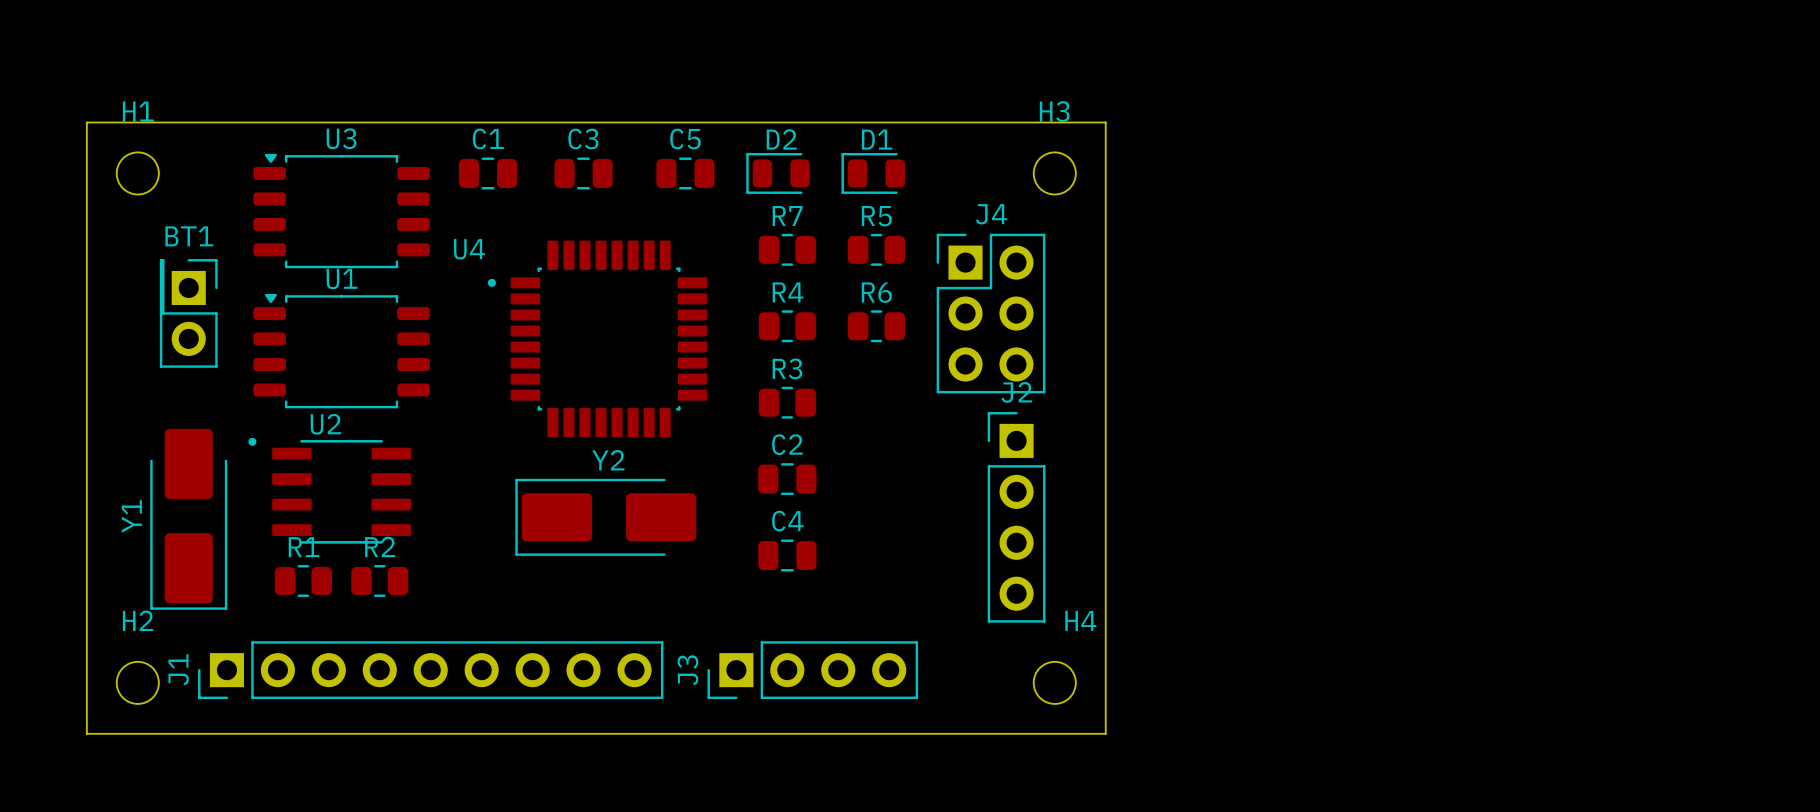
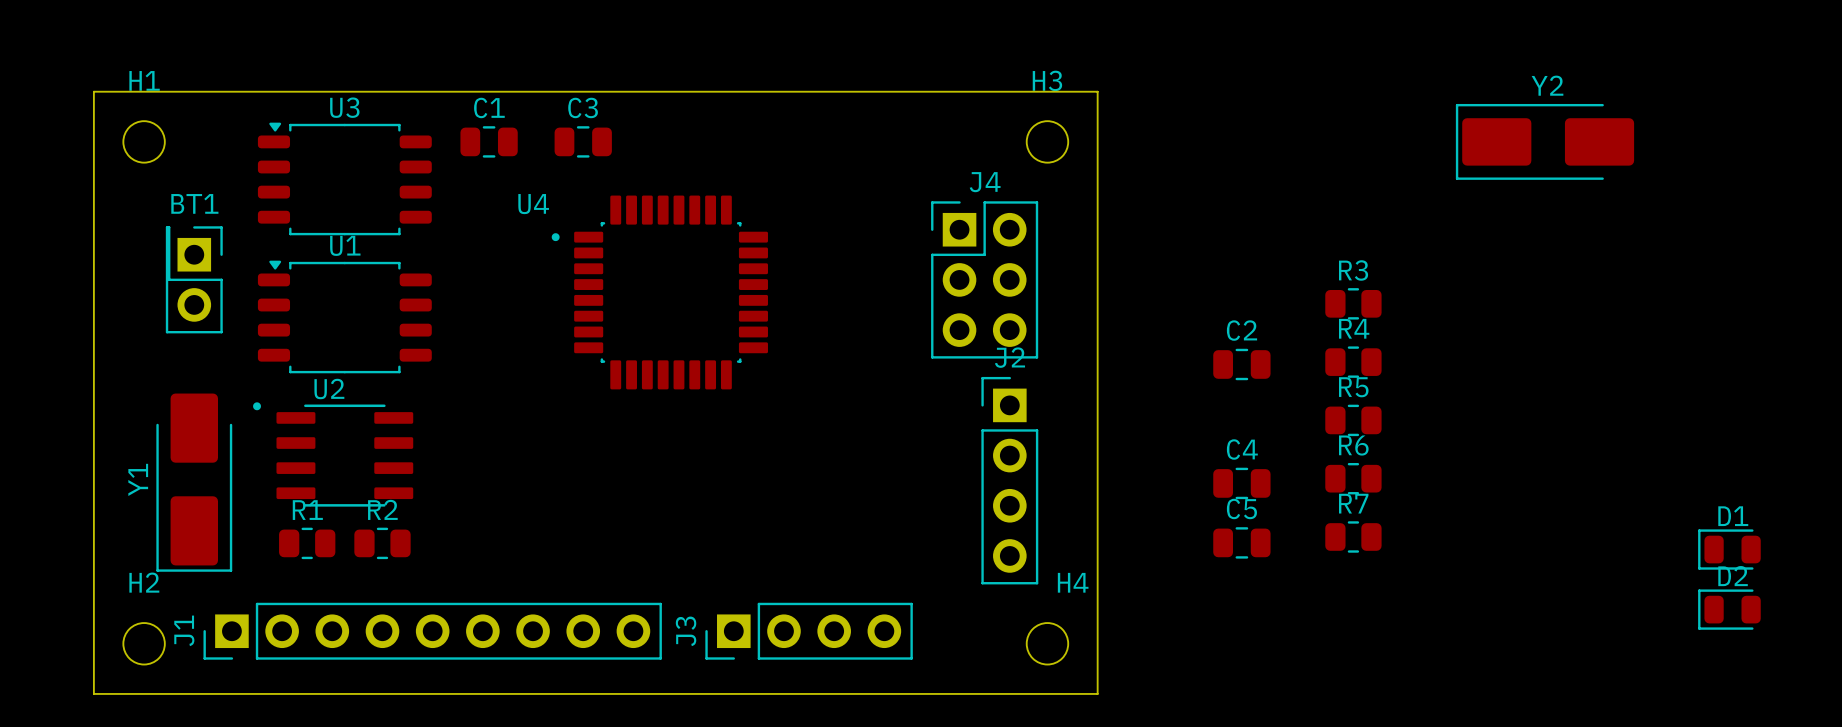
C5 position: (685, 173) -> (1241, 542)
D2 position: (778, 173) -> (1729, 609)
D1 position: (873, 173) -> (1729, 549)
R7 position: (787, 249) -> (1353, 536)
R5 position: (876, 249) -> (1353, 420)
R4 position: (787, 326) -> (1353, 362)
R6 position: (876, 326) -> (1353, 478)
U4 position: (597, 339) -> (659, 292)
R3 position: (787, 402) -> (1353, 303)
C2 position: (787, 479) -> (1241, 364)
Y2 position: (605, 517) -> (1544, 141)
C4 position: (787, 555) -> (1241, 483)

